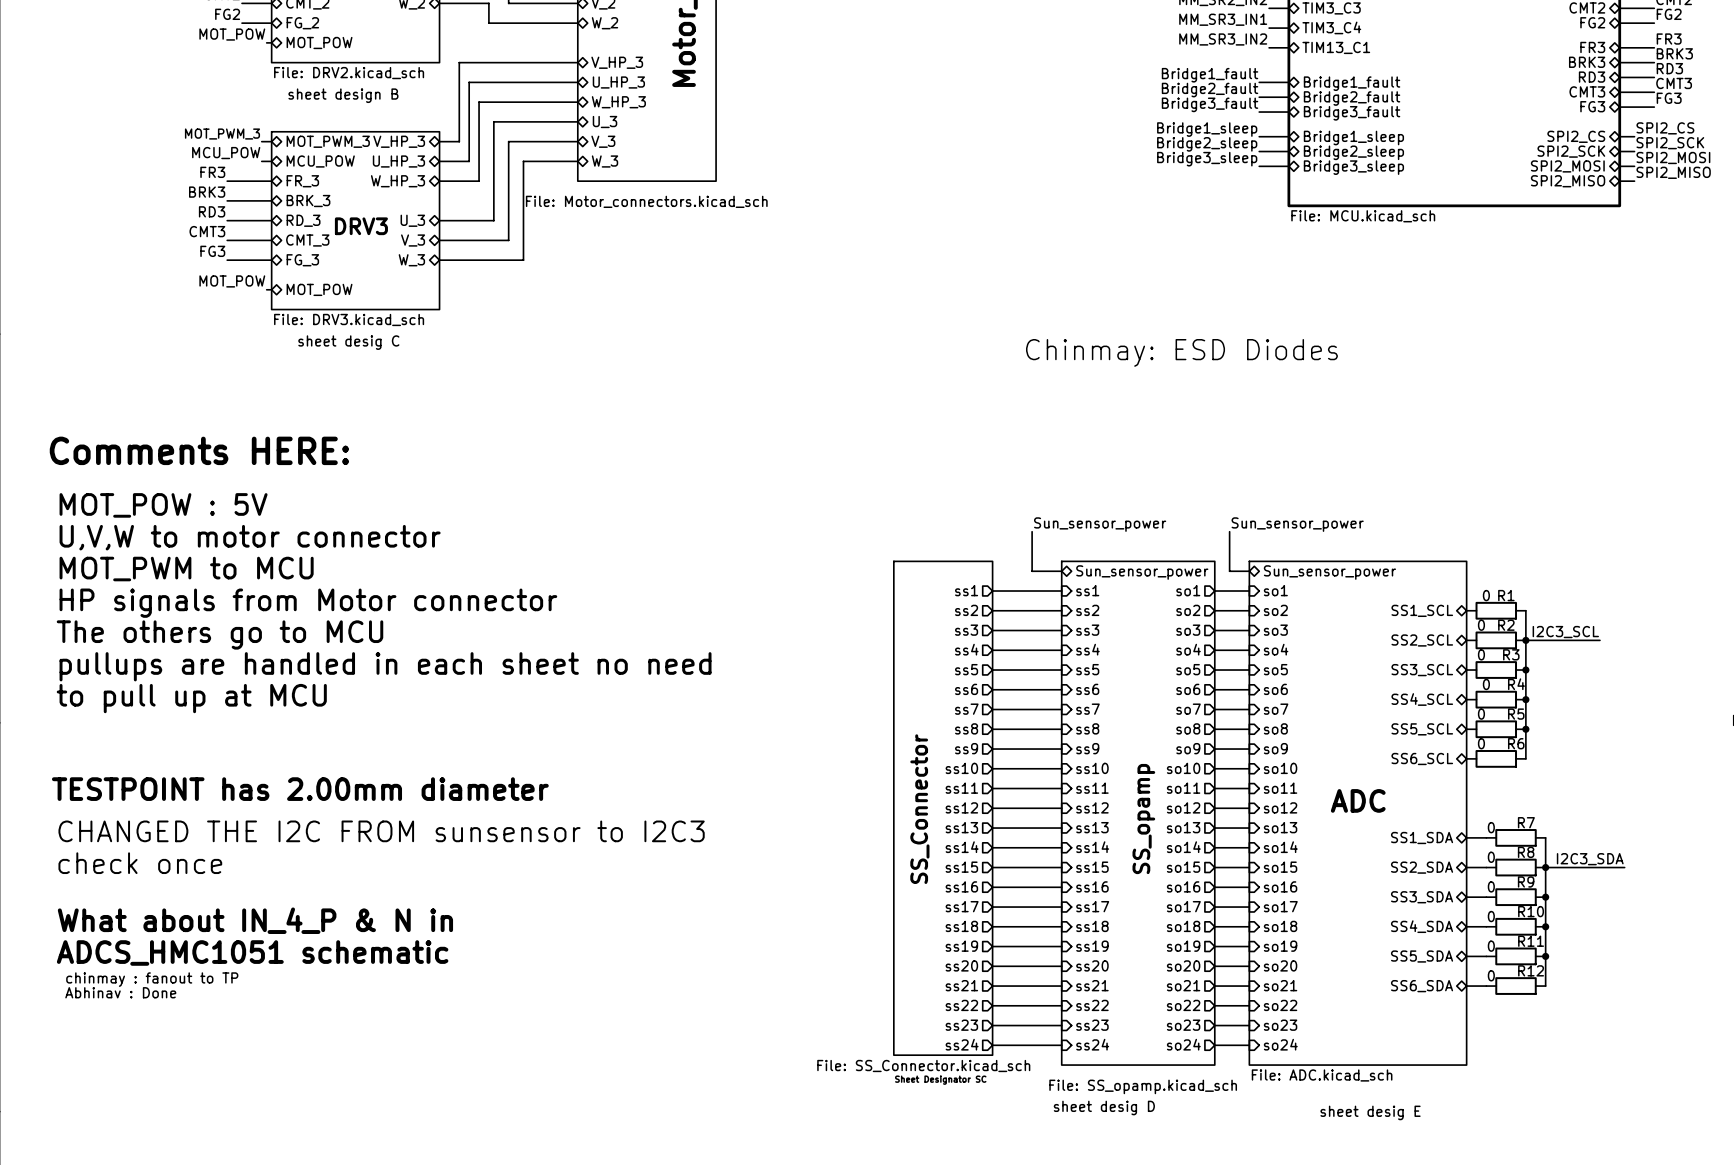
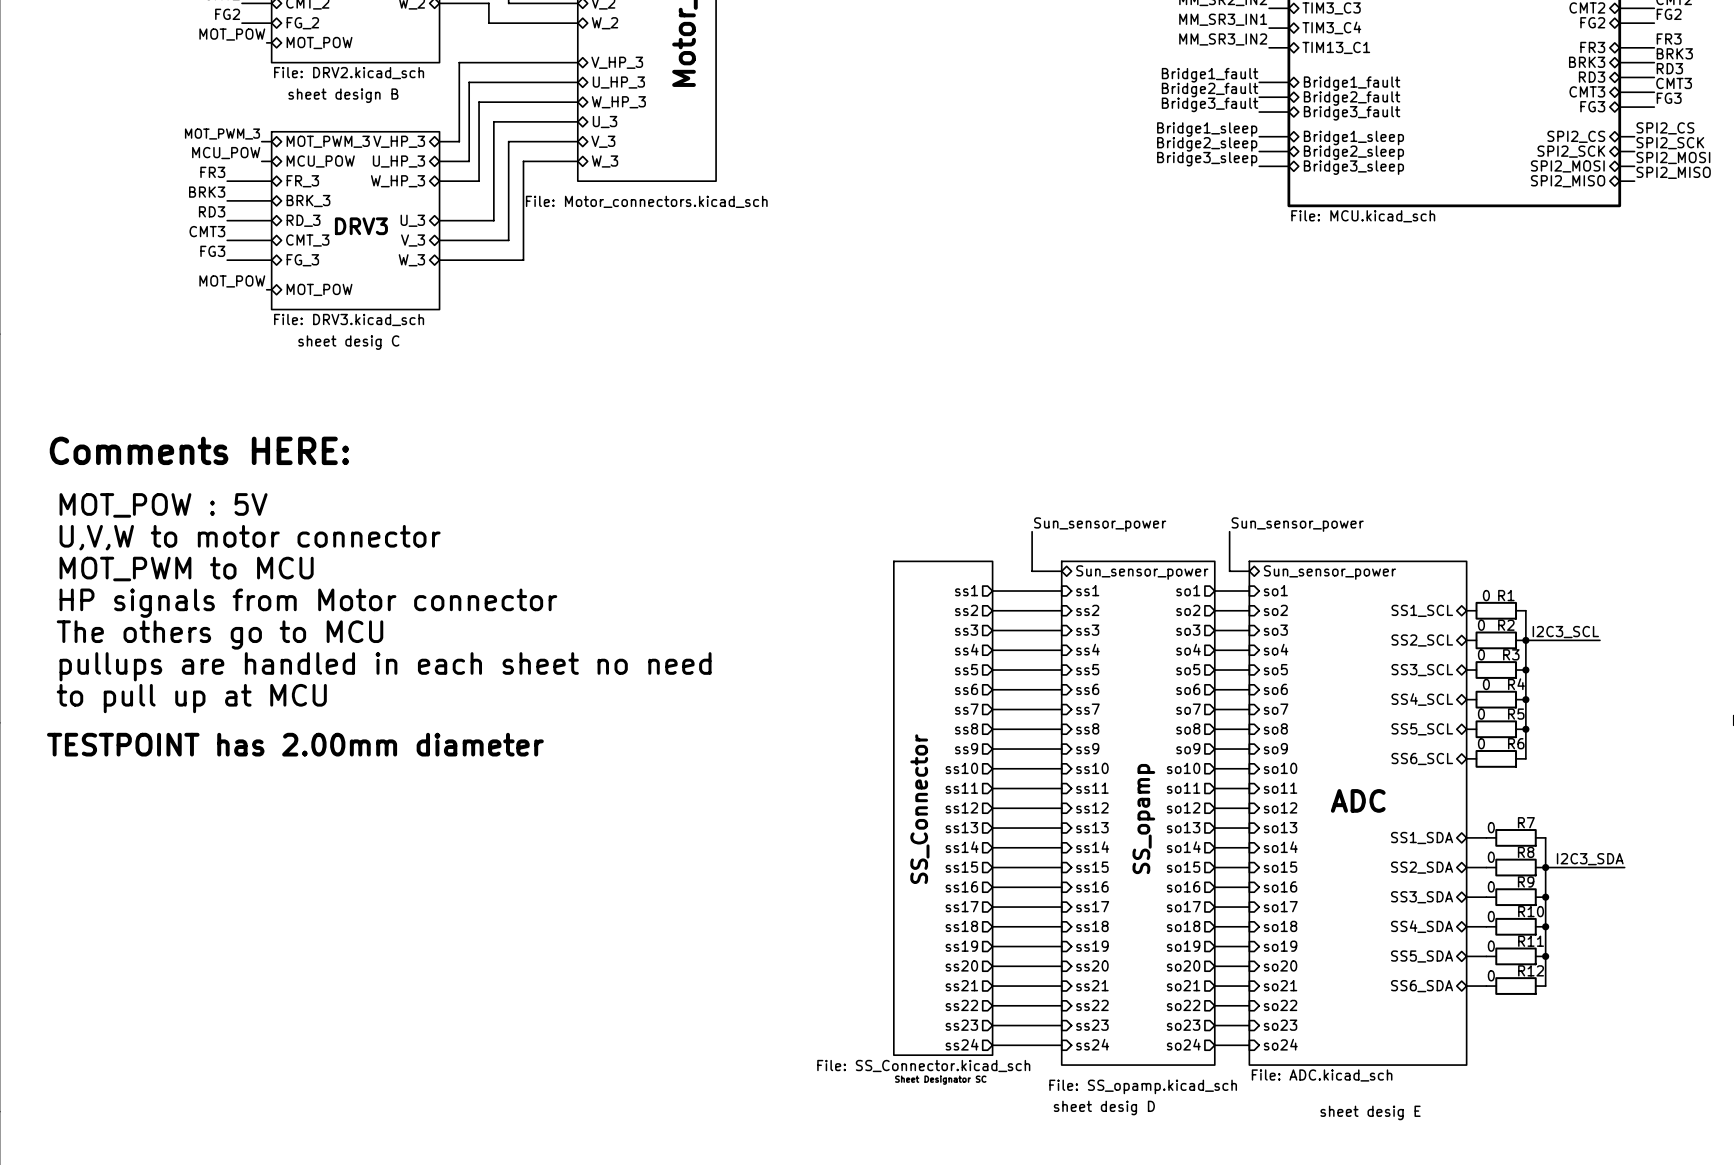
text: Chinmay: ESD Diodes (1181, 352) -> none
text position: TESTPOINT has 2.00mm diameter (300, 789) -> TESTPOINT has 2.00mm diameter (295, 744)
text: CHANGED THE I2C FROM sunsensor to I2C3 (381, 831) -> none
text: check once (140, 863) -> none
text: What about IN_4_P & N in (255, 920) -> none
text: ADCS_HMC1051 schematic (252, 952) -> none
text: chinmay : fanout to TP (152, 979) -> none
text: Abhinav : Done (120, 992) -> none

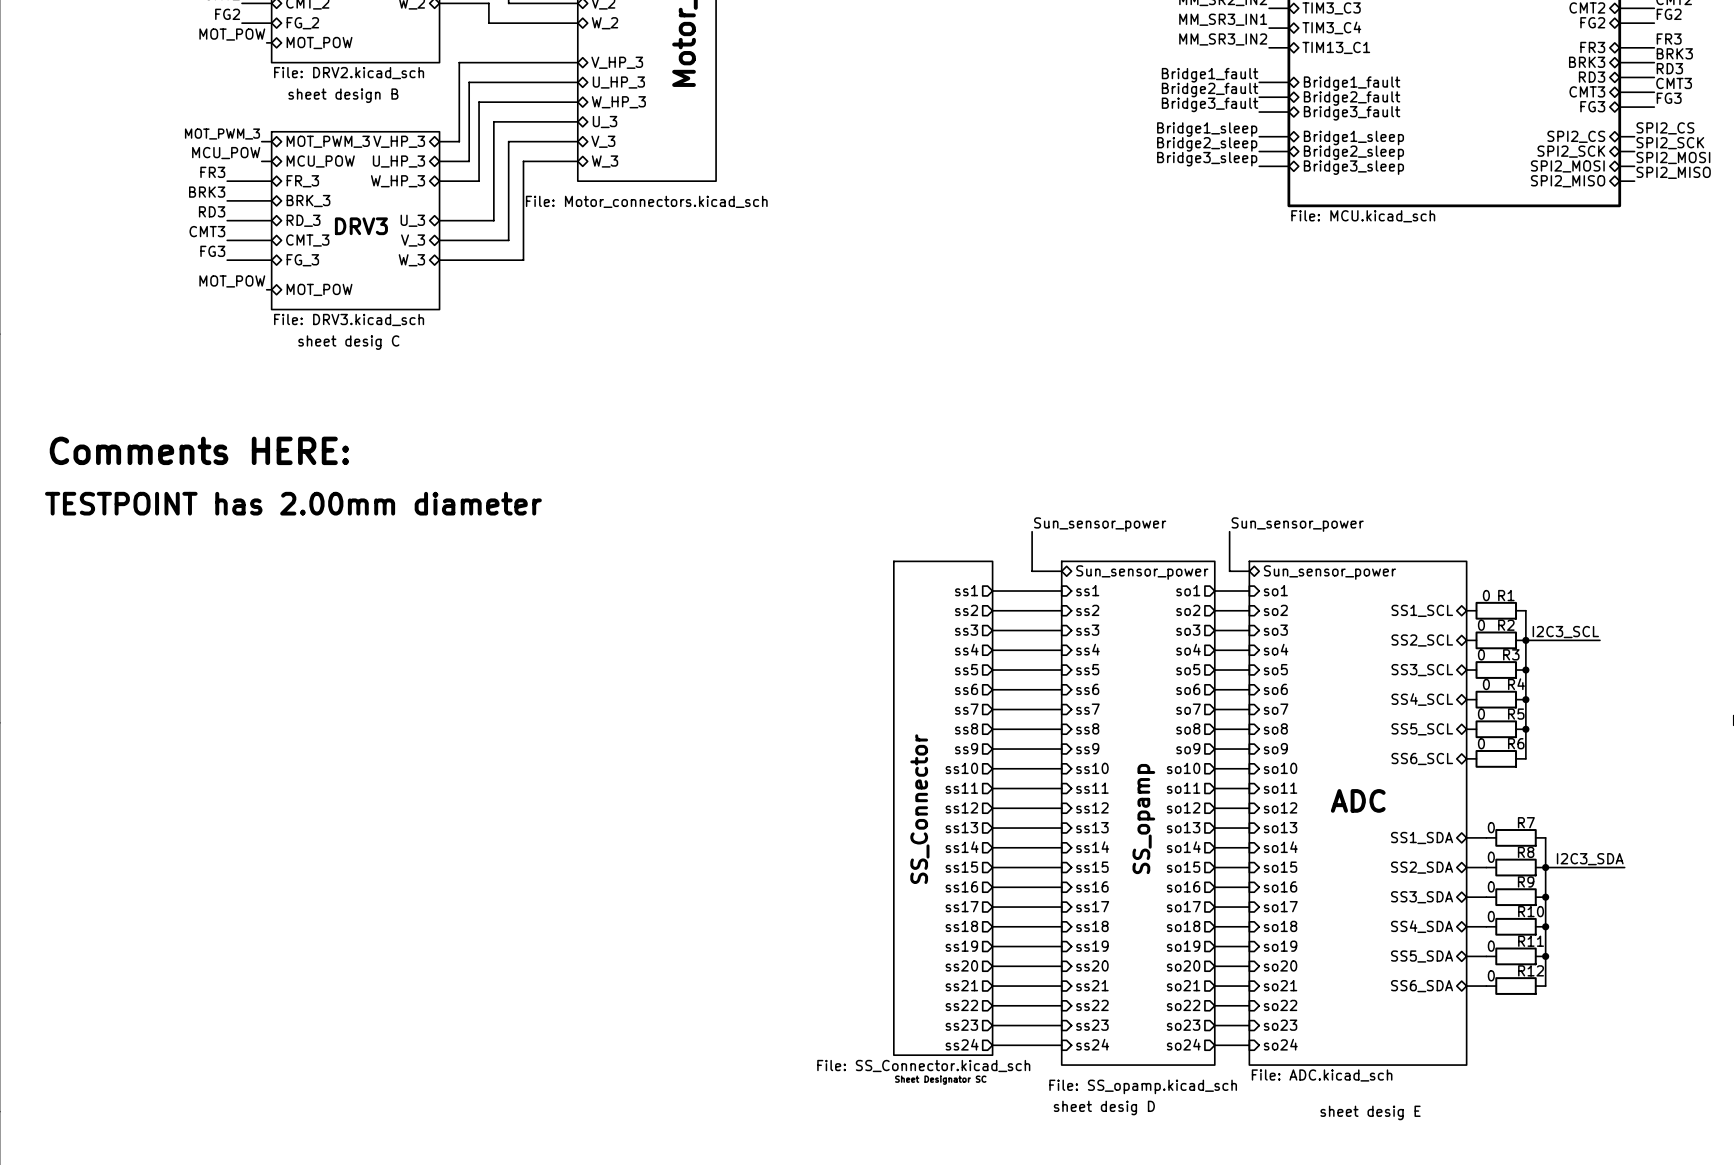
text: none -> TESTPOINT has 2.00mm diameter (293, 503)
text: MOT_POW : 5V (163, 505) -> none
text: U,V,W to motor connector (250, 537) -> none
text: MOT_PWM to MCU (186, 569) -> none
text: HP signals from Motor connector (308, 603) -> none
text: The others go to MCU (219, 634) -> none
text: pullups are handled in each sheet no need (385, 666) -> none
text: to pull up at MCU (191, 698) -> none
text: TESTPOINT has 2.00mm diameter (295, 744) -> none

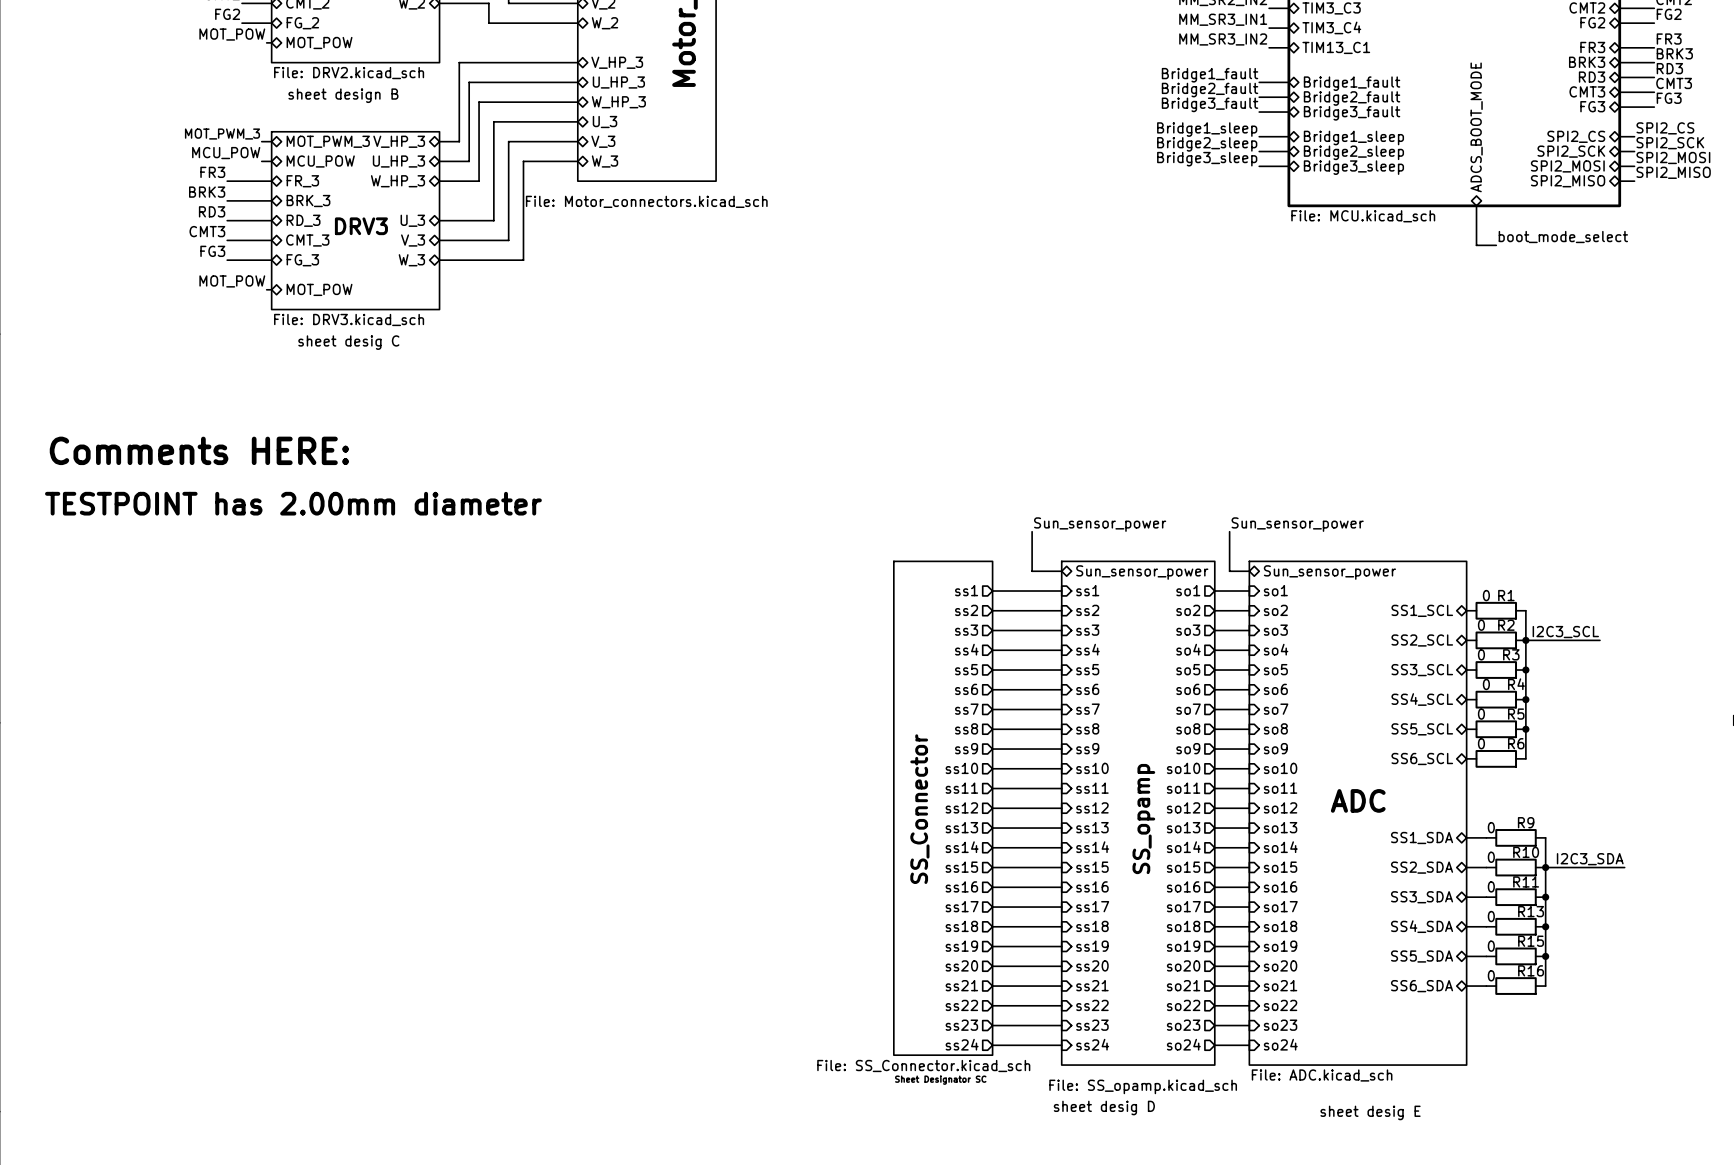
sheet pin: none -> ADCS_BOOT_MODE (1476, 127)
wire: none -> (1476, 205) (1476, 245) (1496, 245)
label: none -> boot_mode_select (1563, 237)
R7 name: R7 (1526, 822) -> R9 (1526, 822)
R8 name: R8 (1526, 852) -> R10 (1526, 852)
R9 name: R9 (1526, 881) -> R11 (1526, 881)
R10 name: R10 (1531, 911) -> R13 (1531, 911)
R11 name: R11 (1531, 941) -> R15 (1531, 941)
R12 name: R12 (1531, 970) -> R16 (1531, 970)

